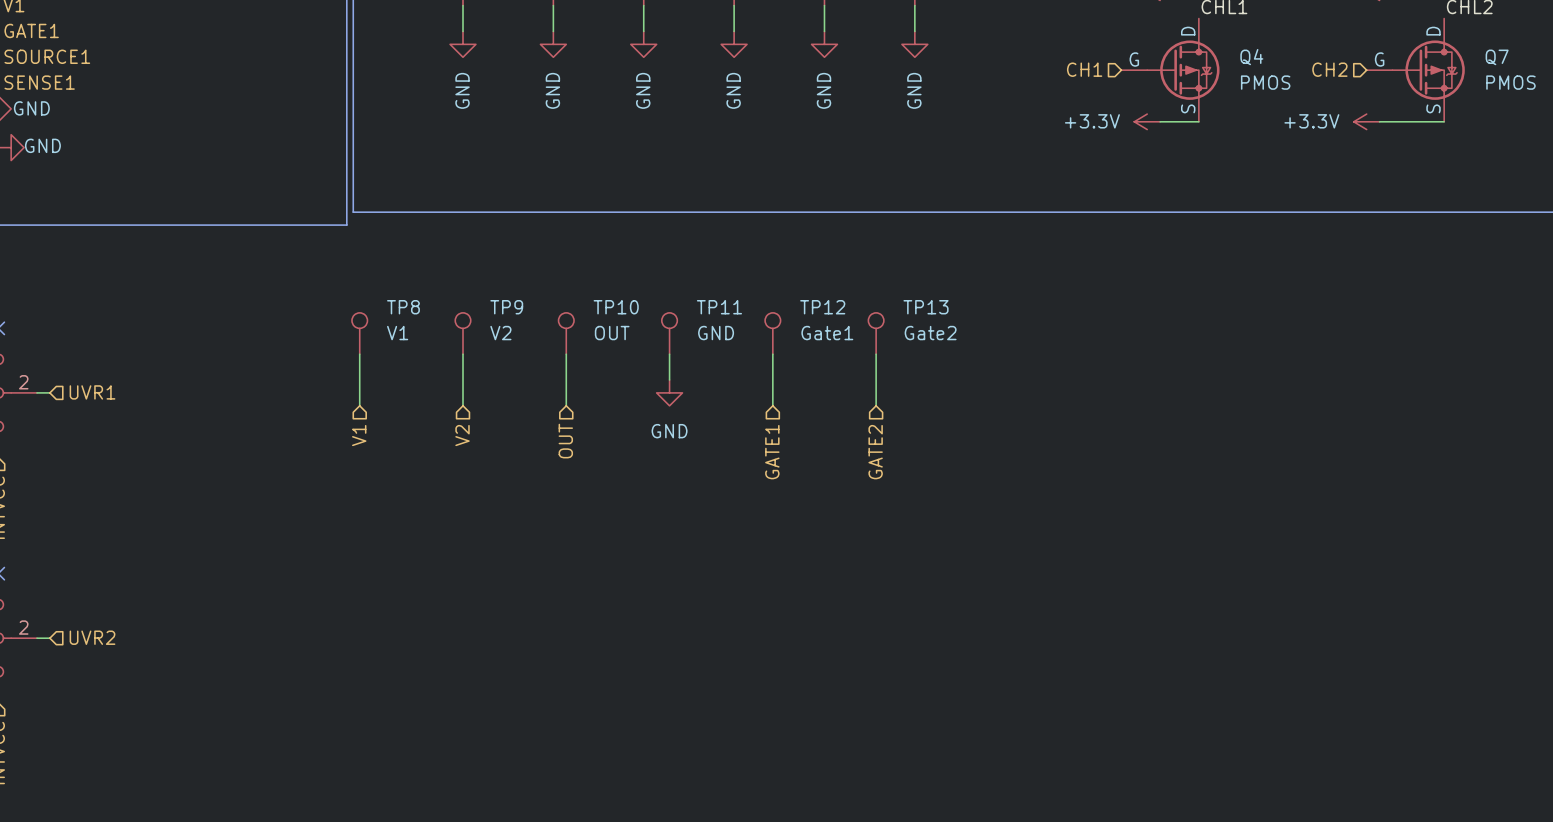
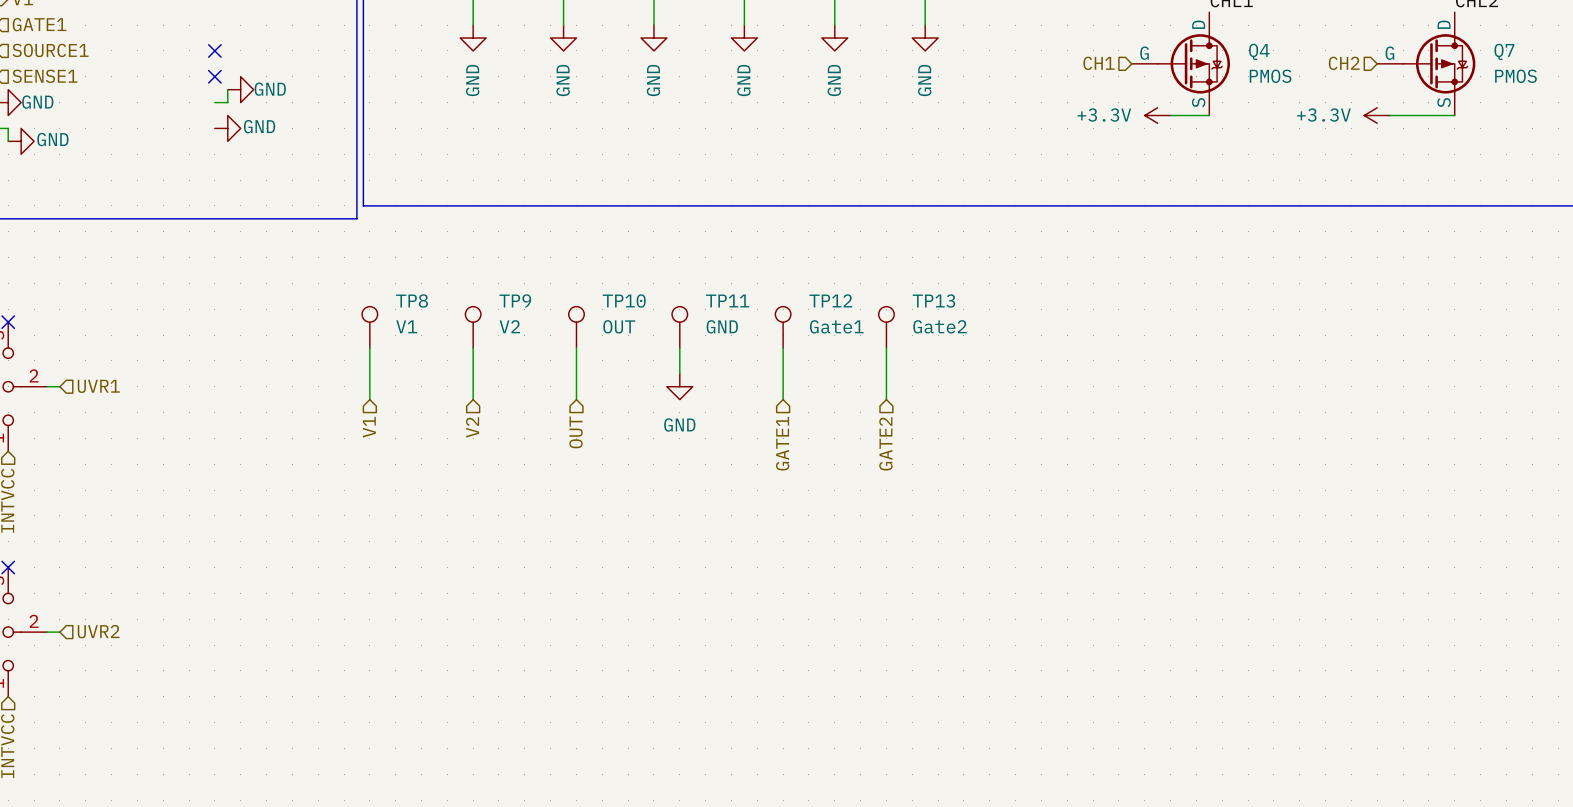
no-connect mark: none -> (214, 50)
no-connect mark: none -> (214, 76)
wire: none -> (227, 89) (227, 102) (214, 102)
power symbol: none -> GND (240, 89)
power symbol: none -> GND (227, 128)

